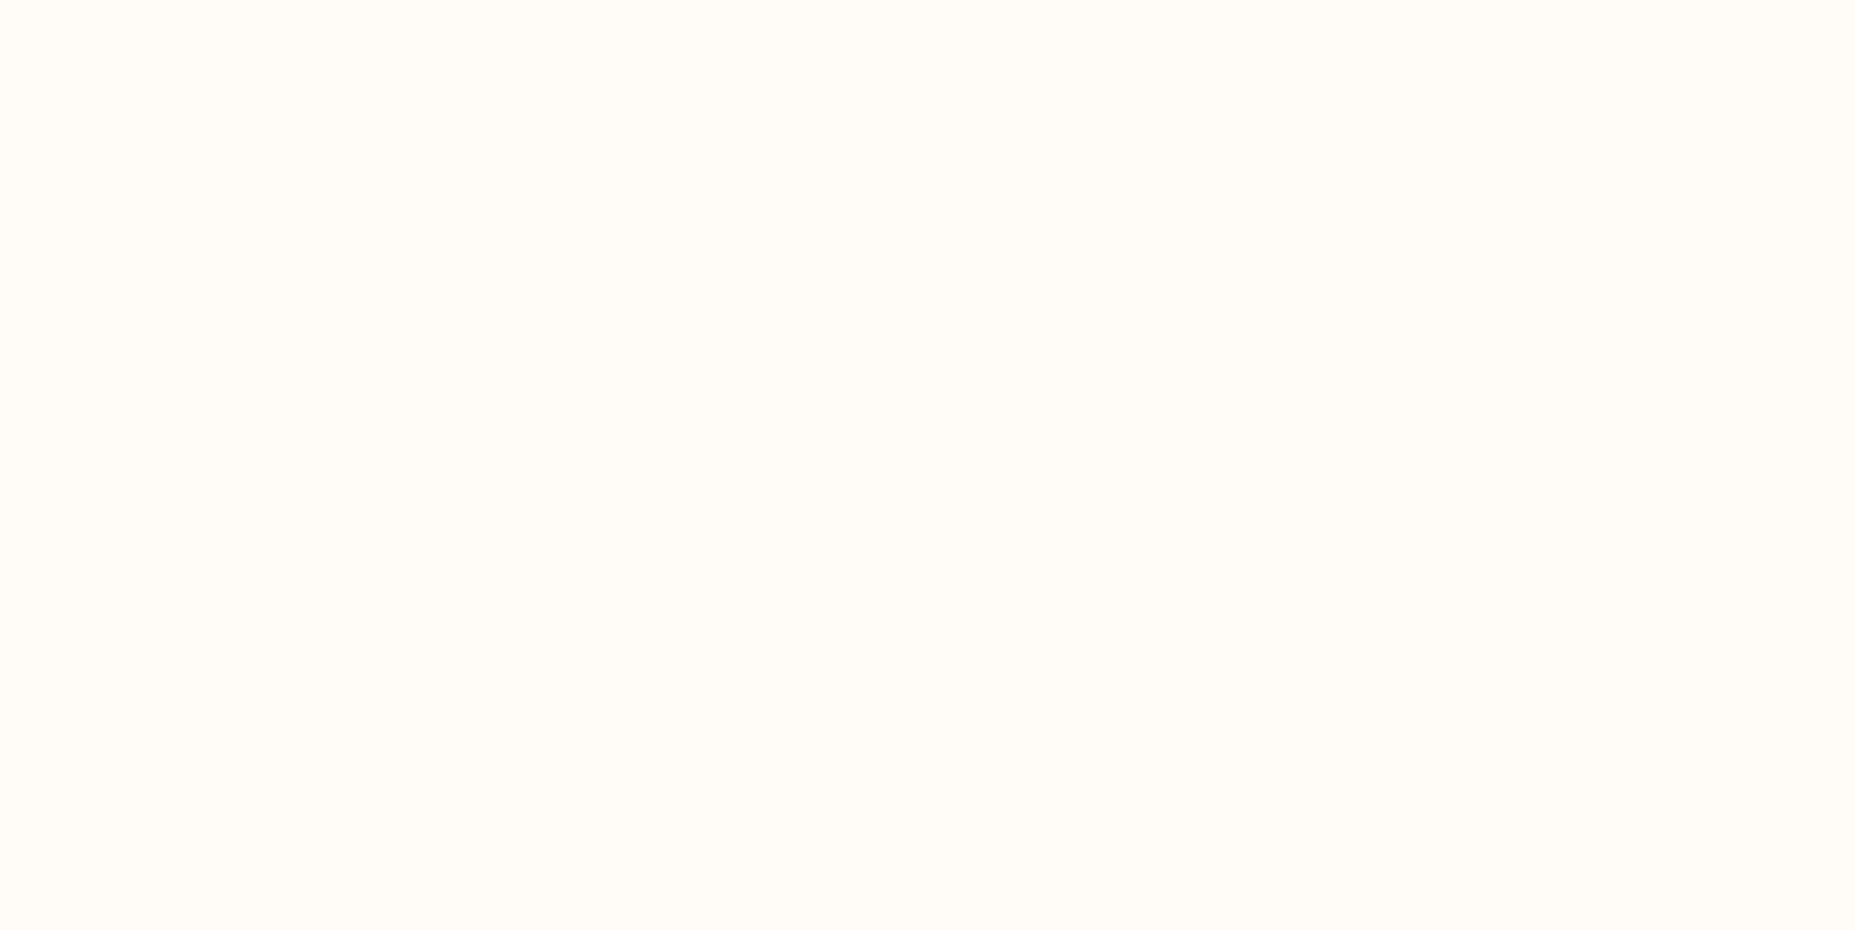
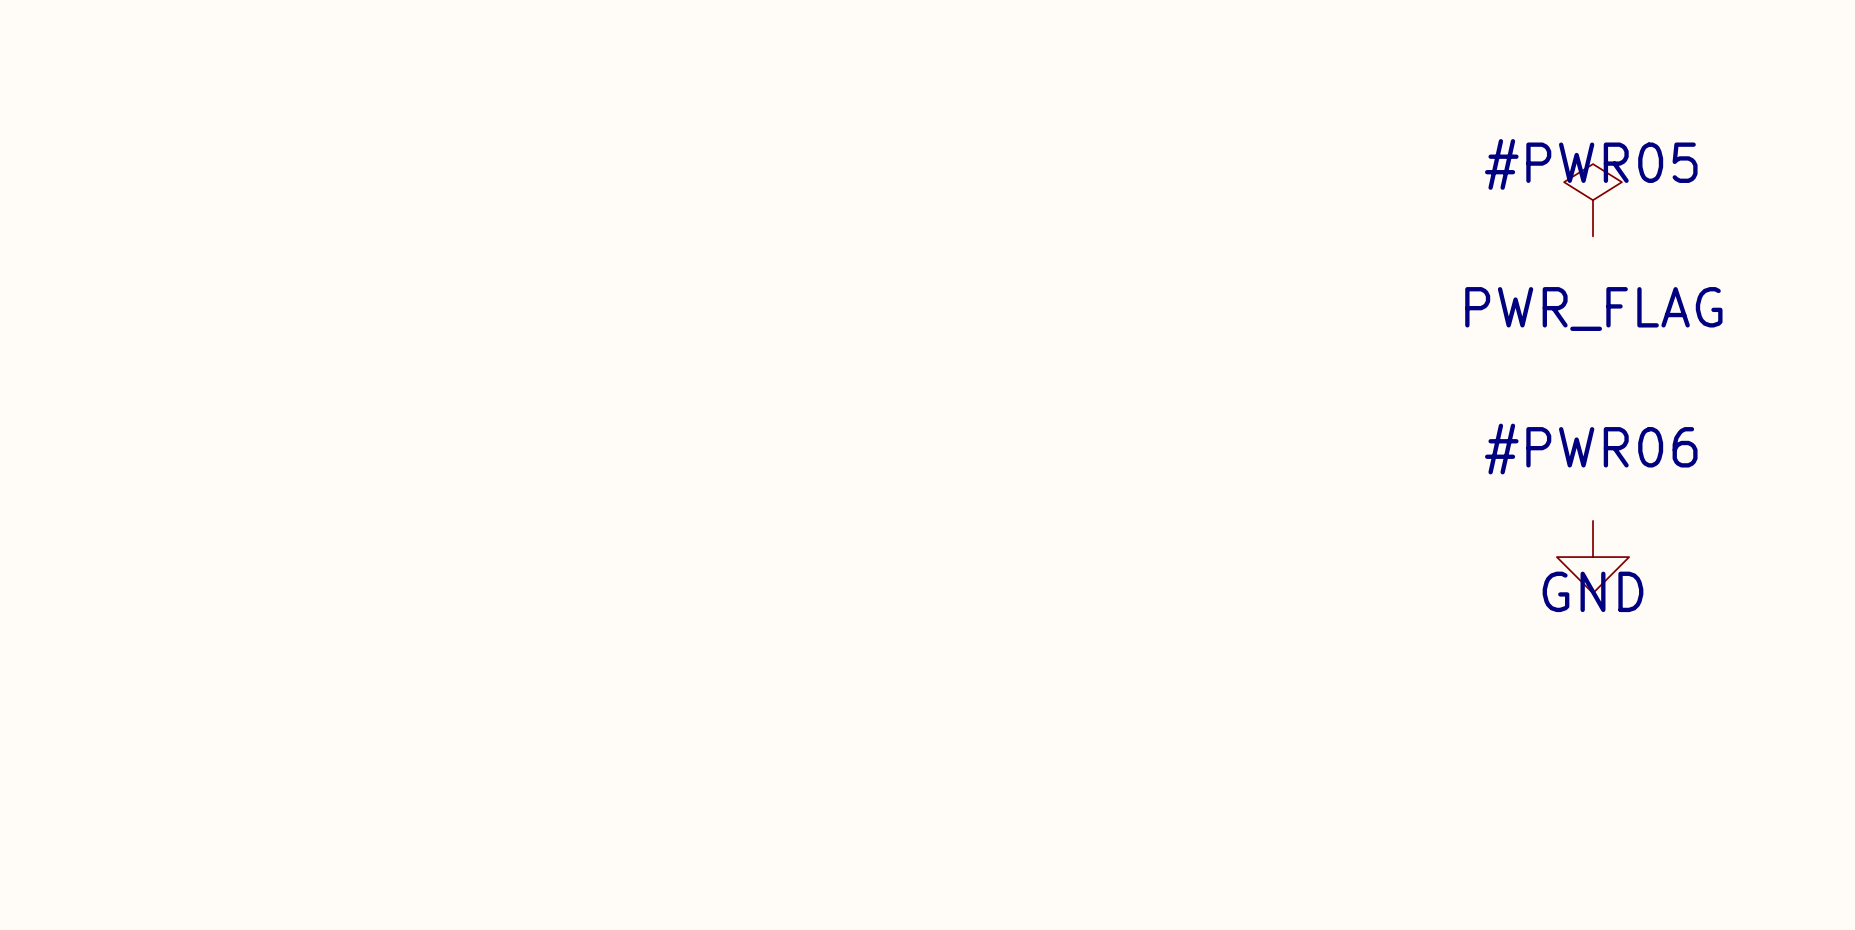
#PWR05: none -> PWR_FLAG (1593, 200)
#PWR06: none -> GND (1593, 557)

